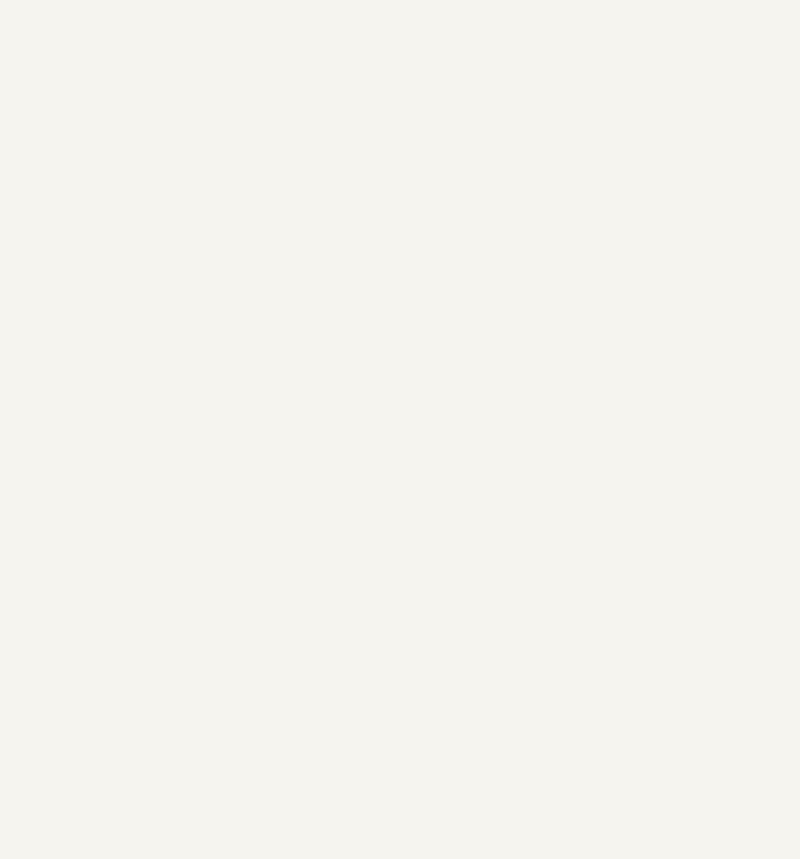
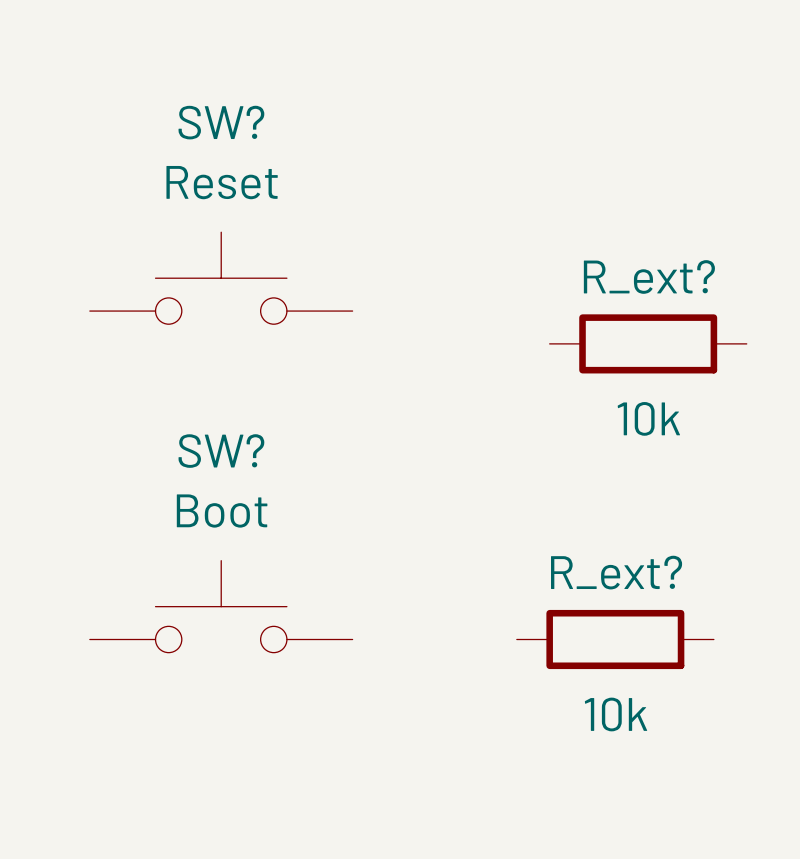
SW?: none -> Reset (221, 278)
R_ext?: none -> 10k (648, 343)
SW?: none -> Boot (221, 606)
R_ext?: none -> 10k (615, 639)

